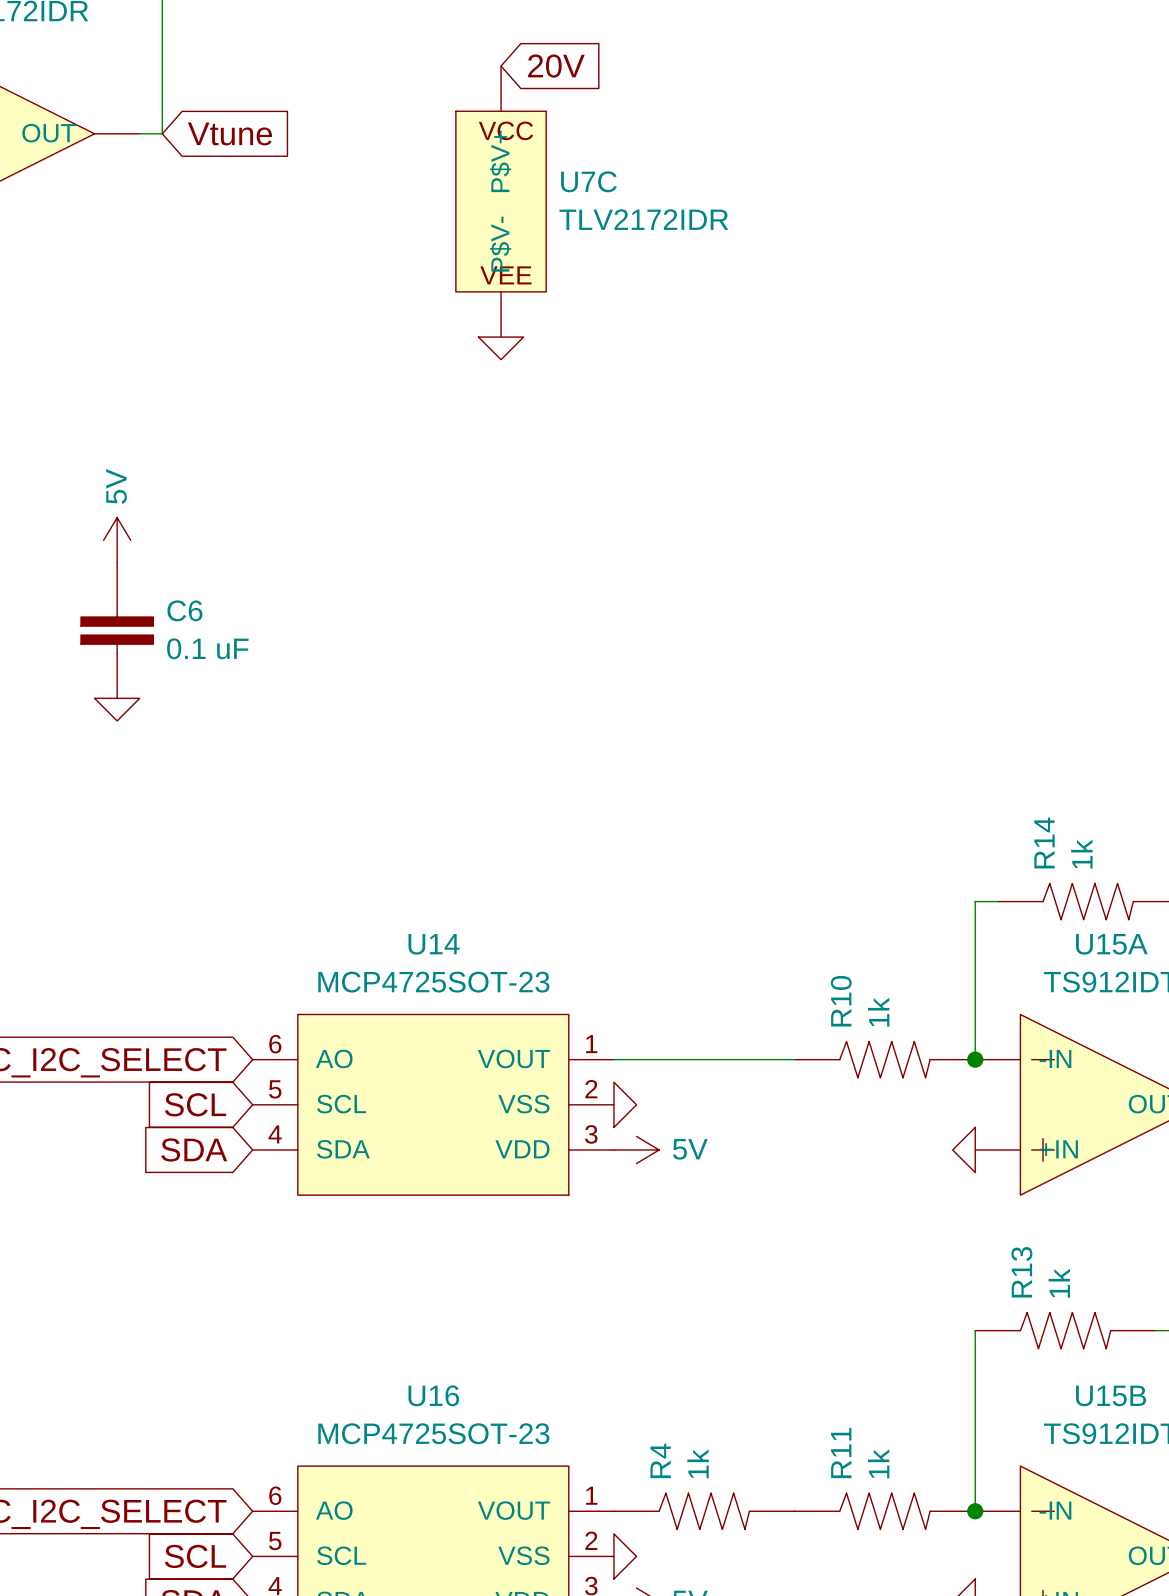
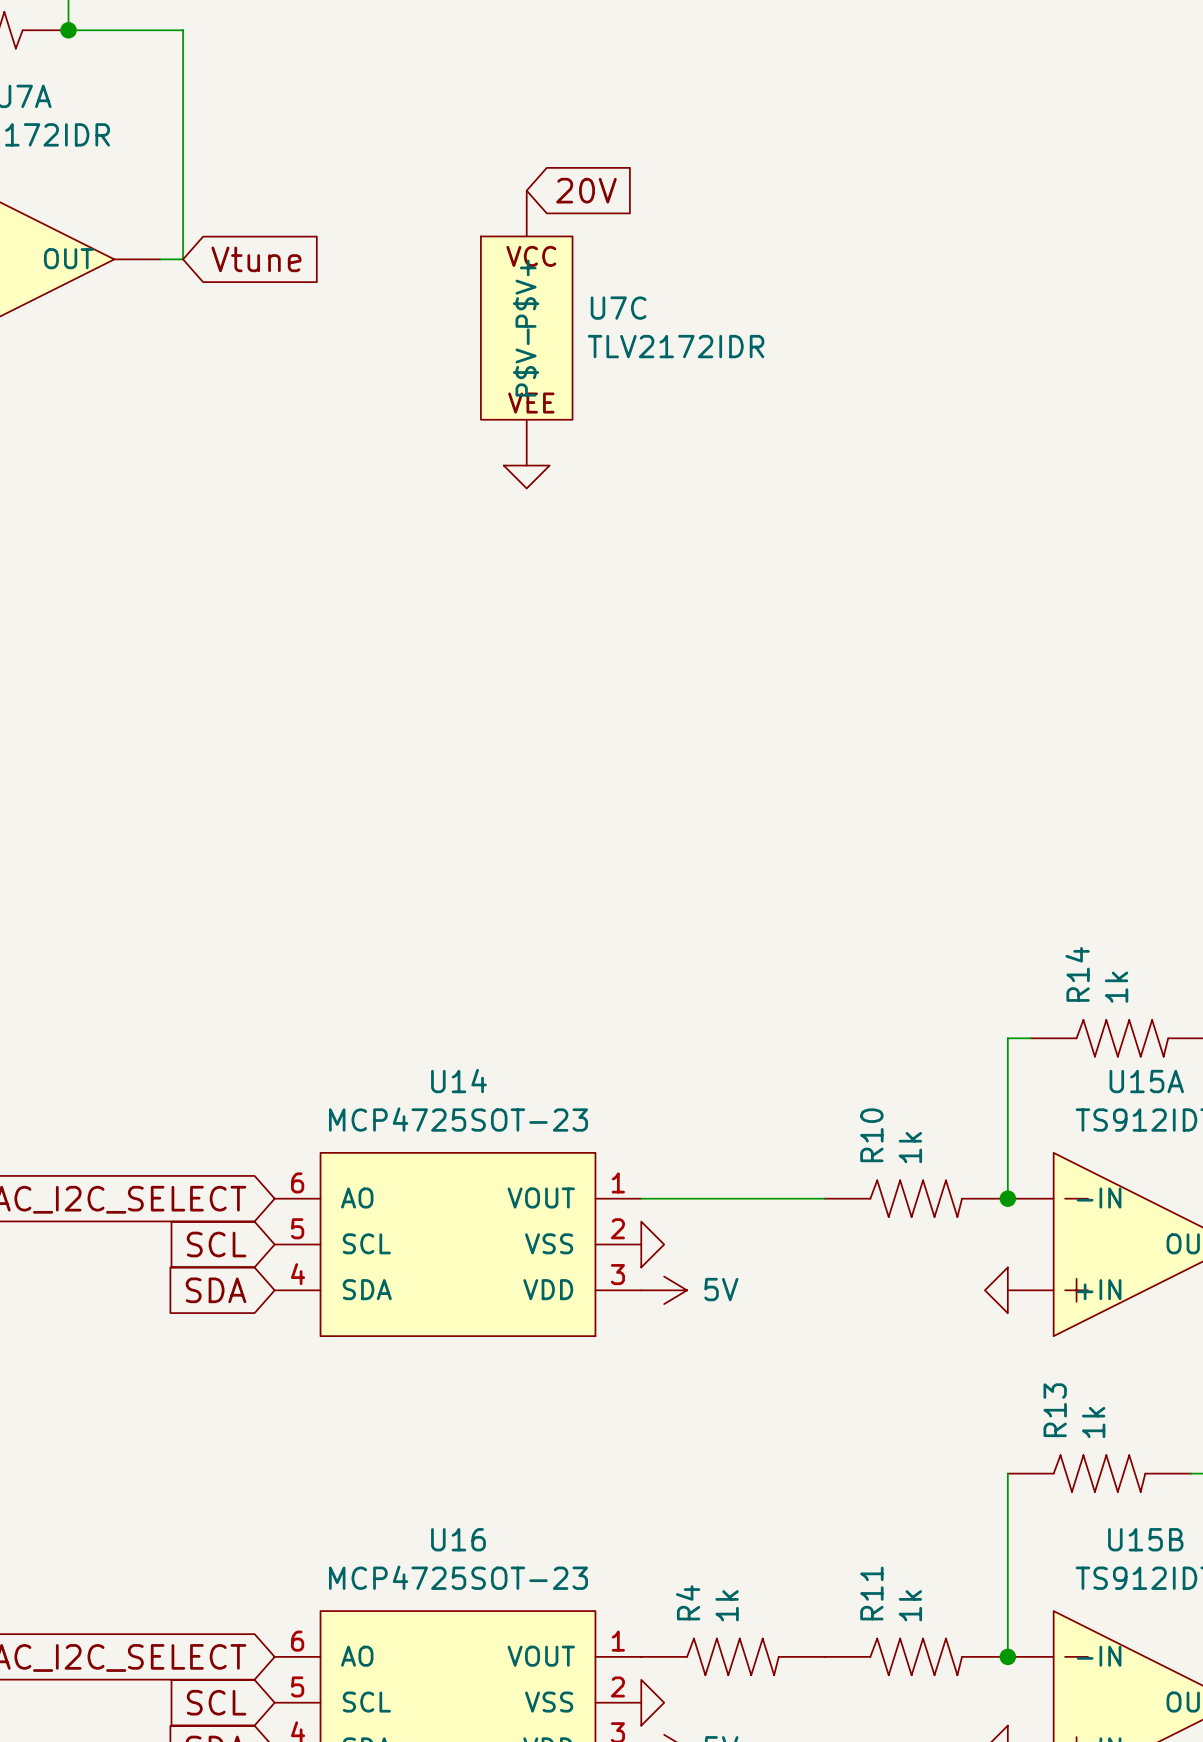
power symbol: 5V (117, 540) -> none
C6: 0.1 uF (117, 630) -> none
power symbol: (117, 709) -> none

